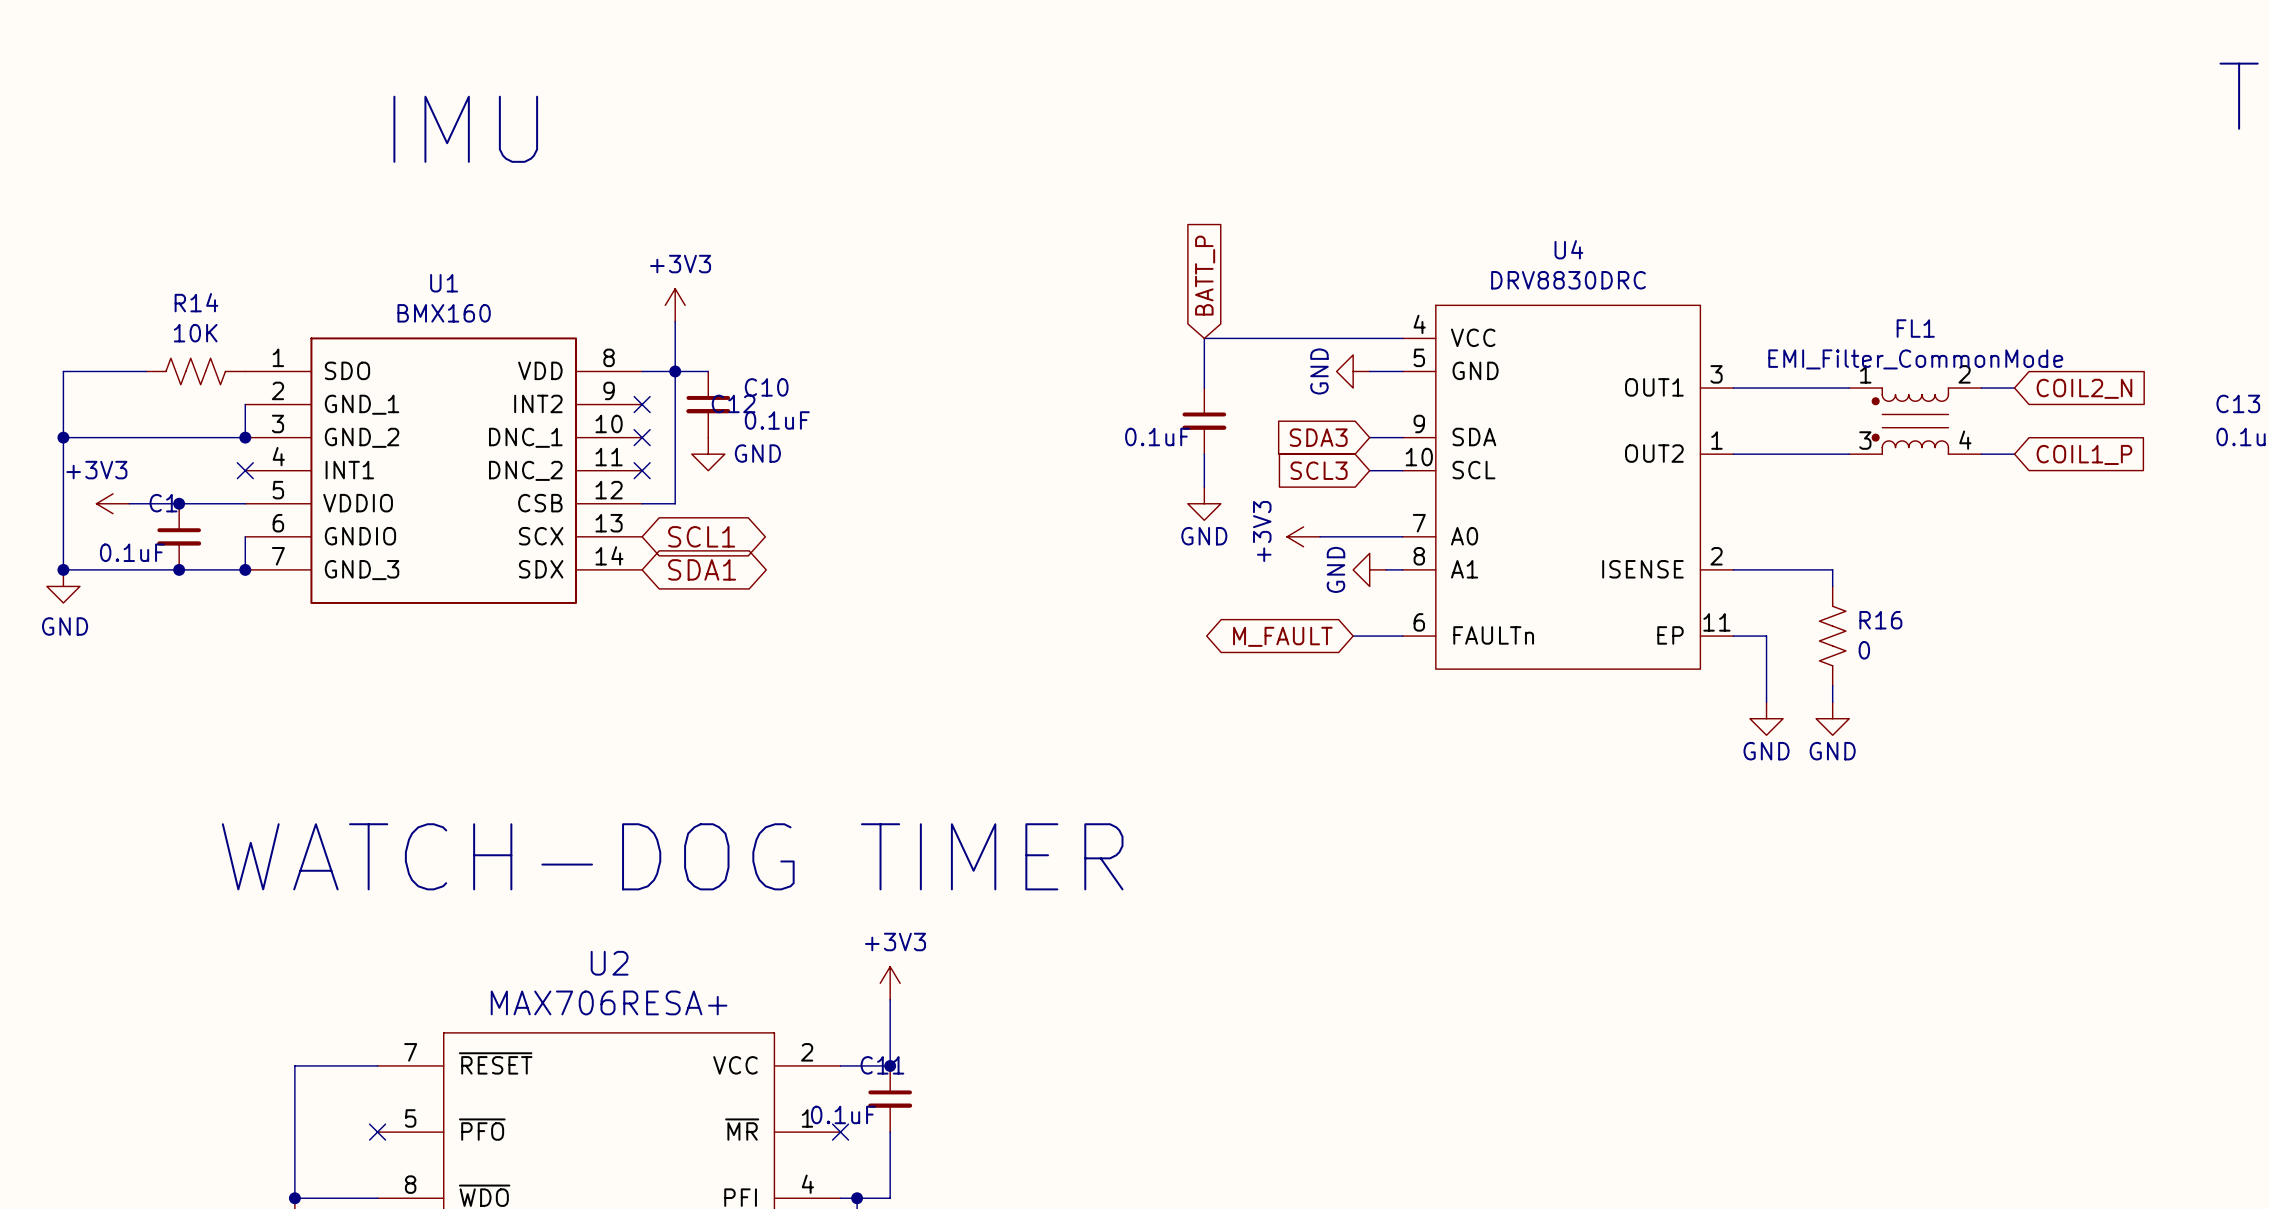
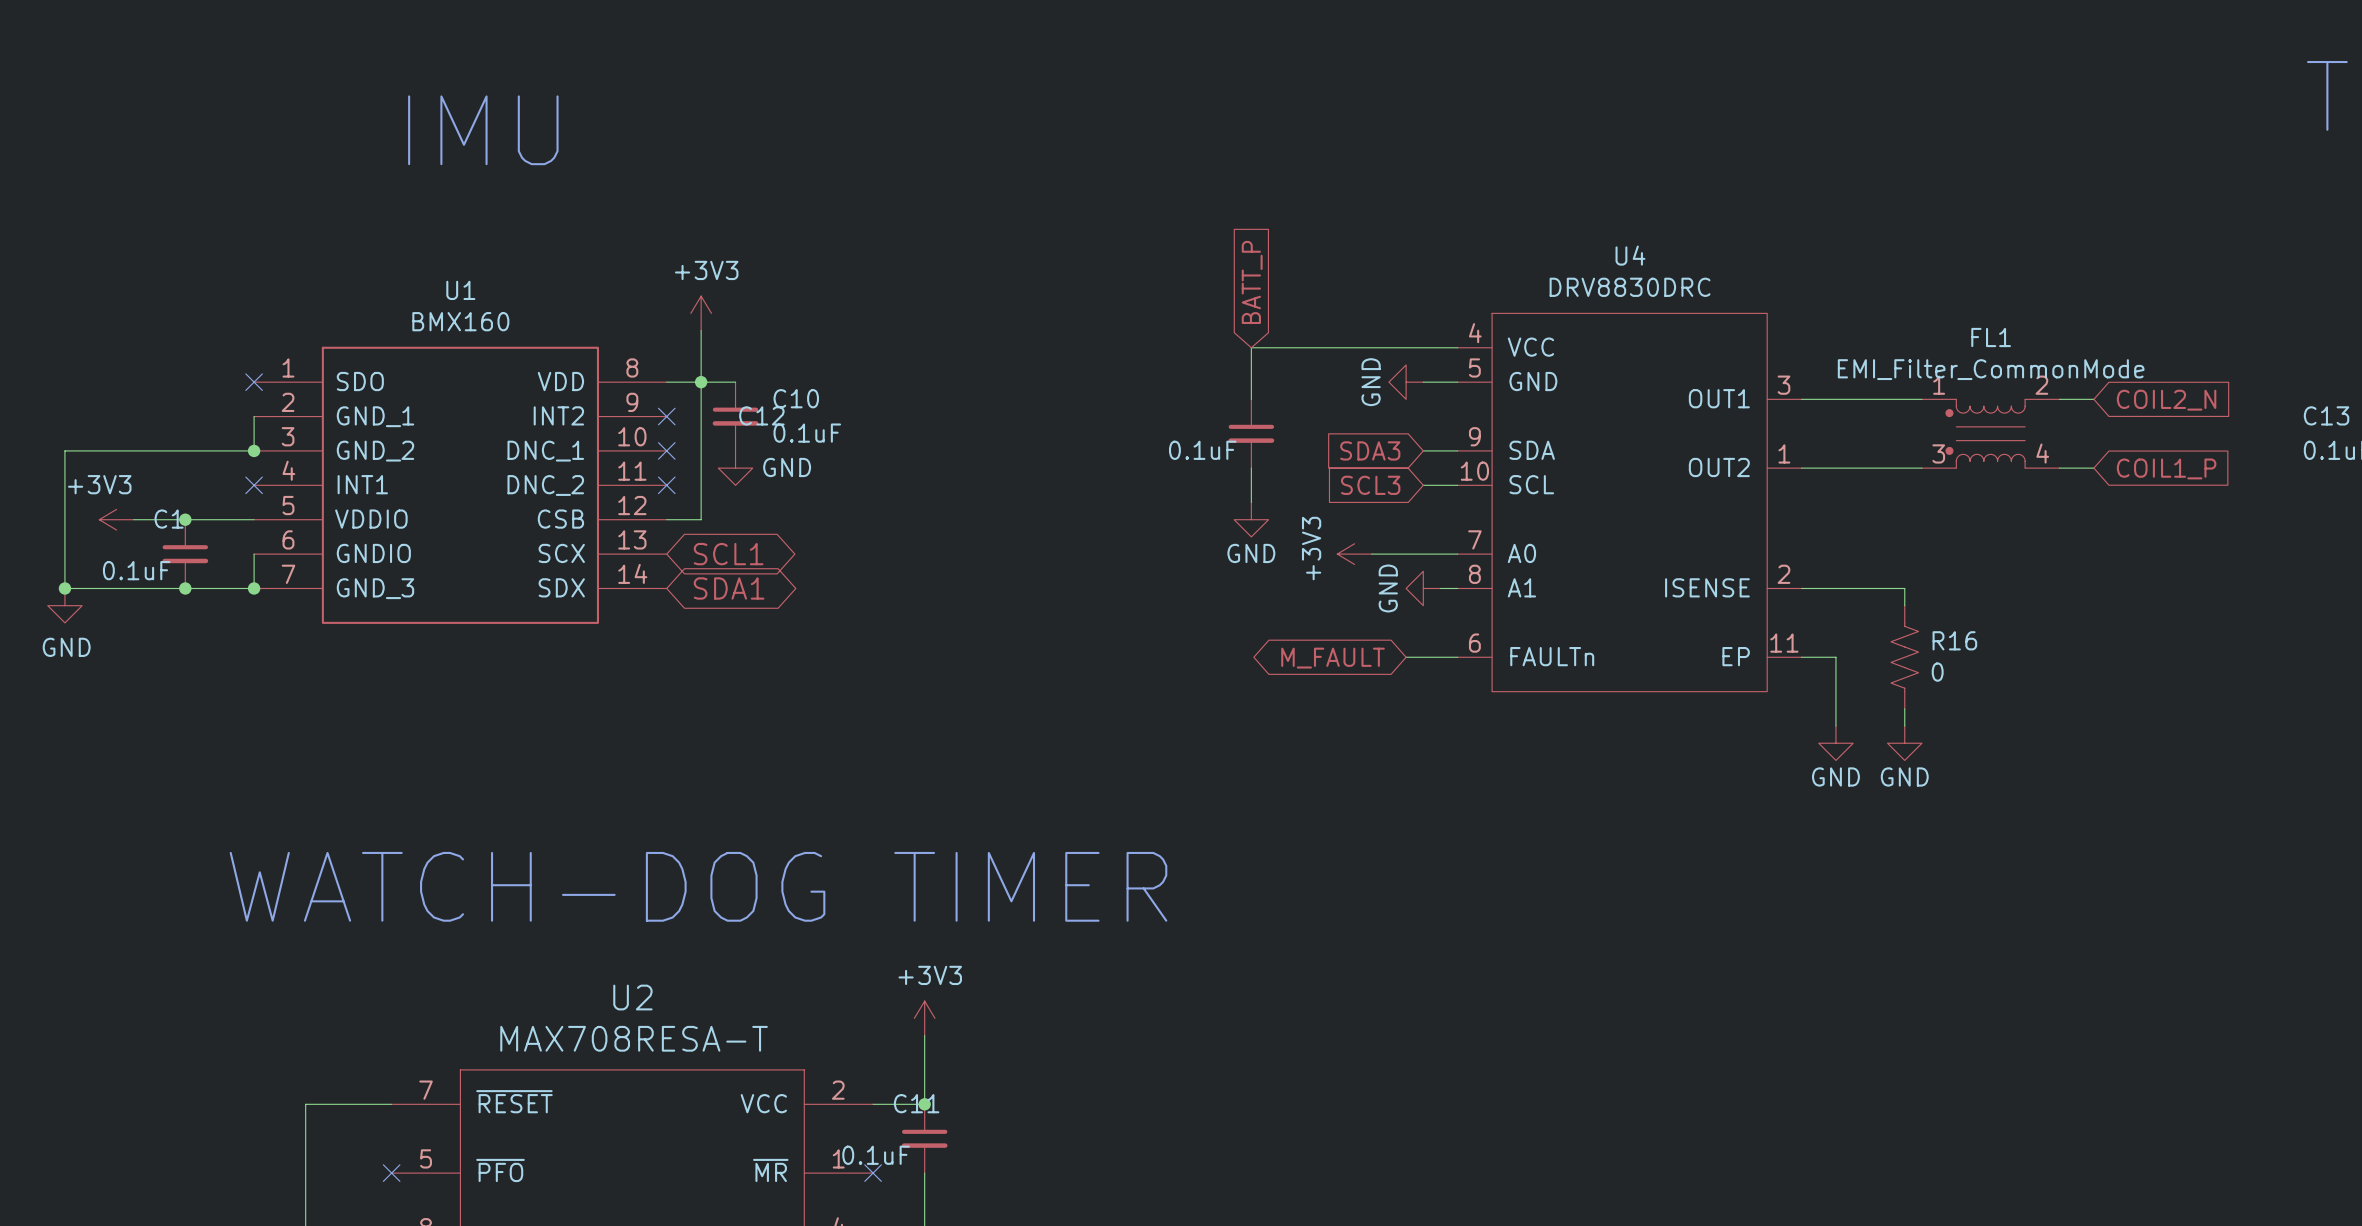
wire: (146, 371) (63, 371) (63, 437) -> none
R14: 10K (195, 371) -> none
no-connect mark: none -> (254, 382)
junction: (63, 437) -> none
U2 value: MAX706RESA+ (609, 1002) -> MAX708RESA-T (634, 1038)

